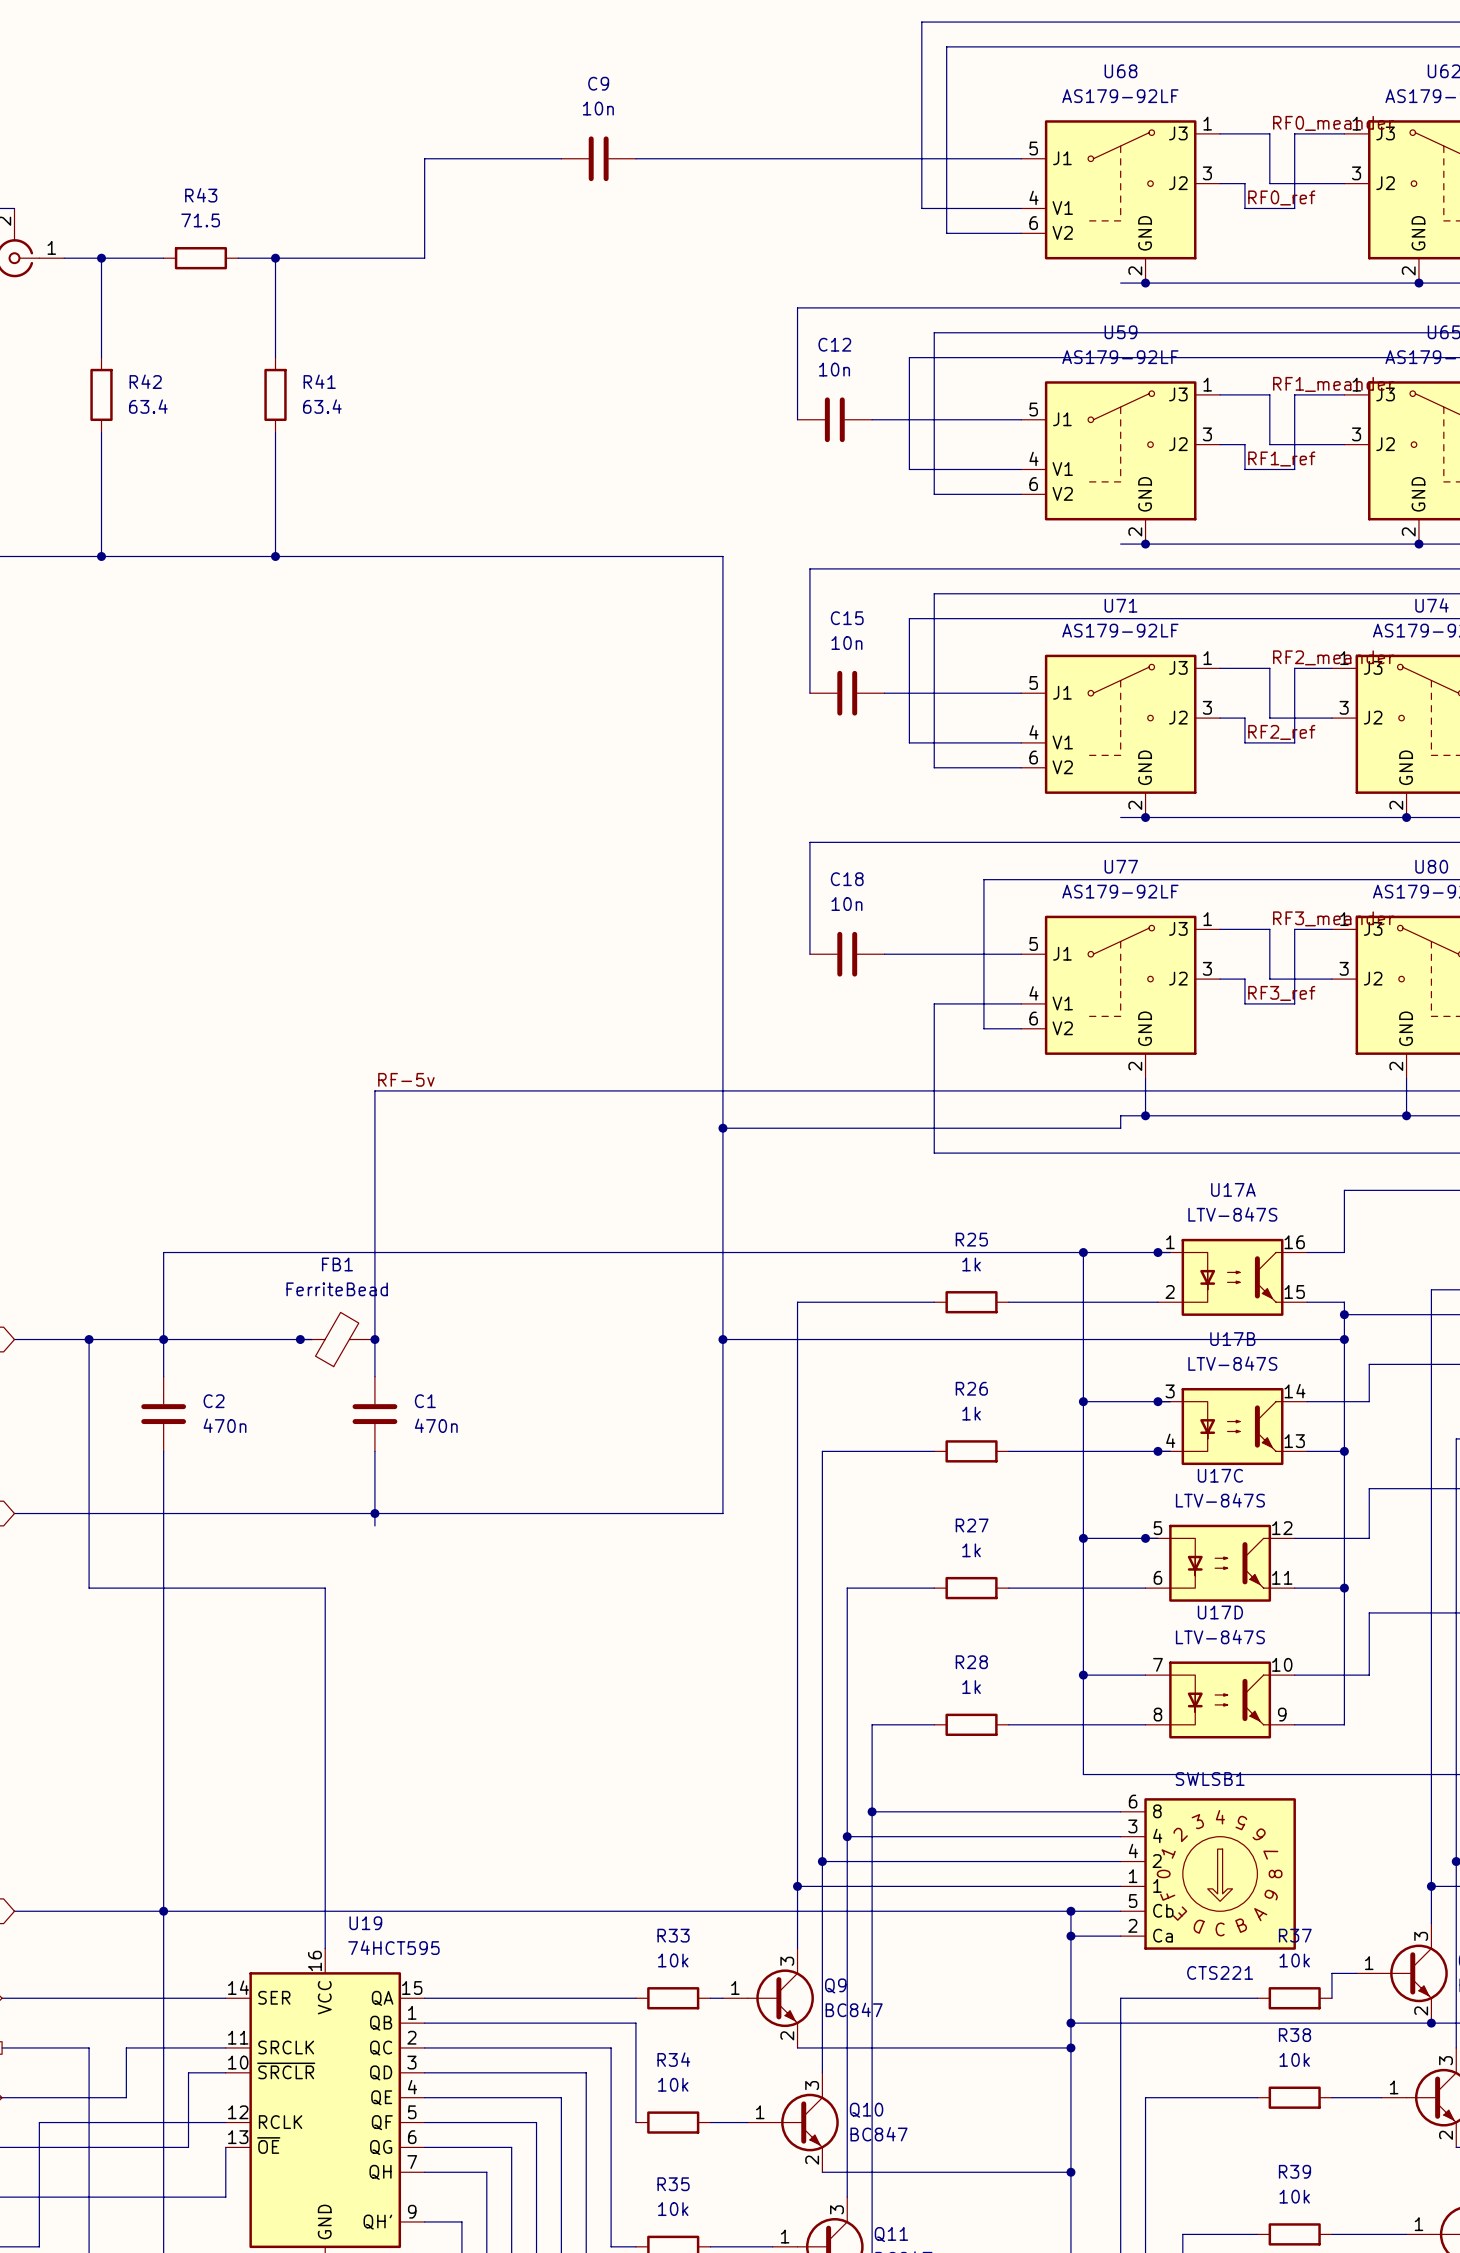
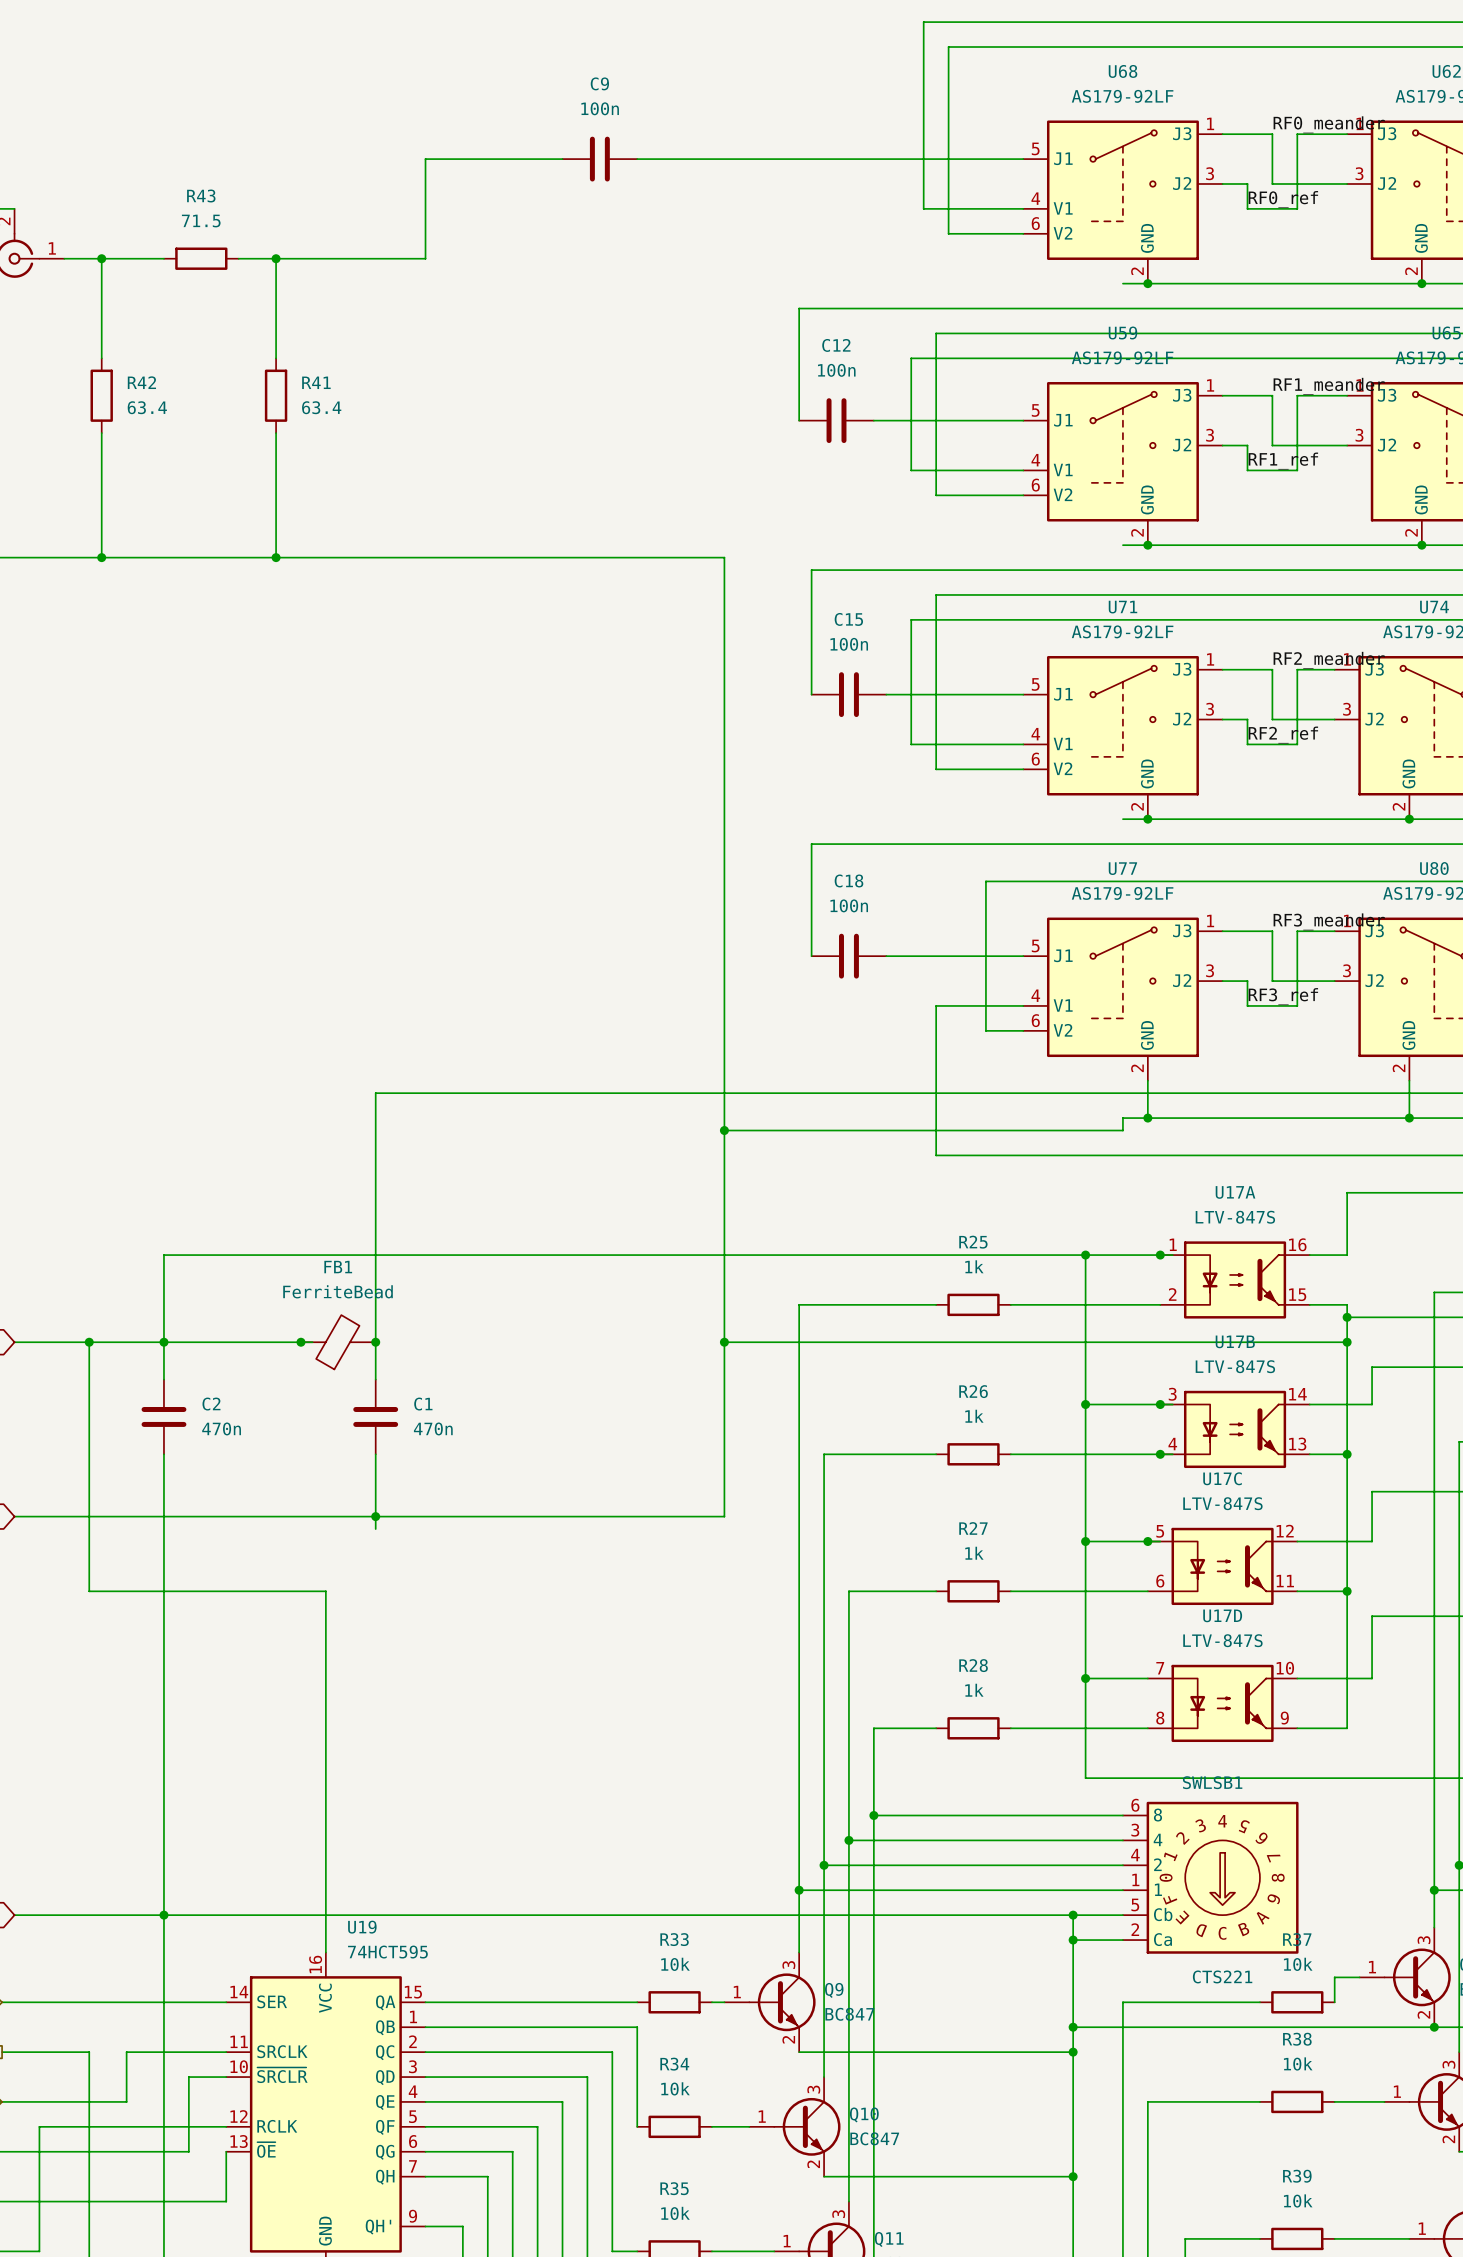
C9 value: 10n (598, 108) -> 100n (600, 108)
C12 value: 10n (834, 369) -> 100n (836, 370)
C15 value: 10n (846, 643) -> 100n (849, 644)
C18 value: 10n (846, 904) -> 100n (849, 905)
label: RF-5v (406, 1079) -> none

